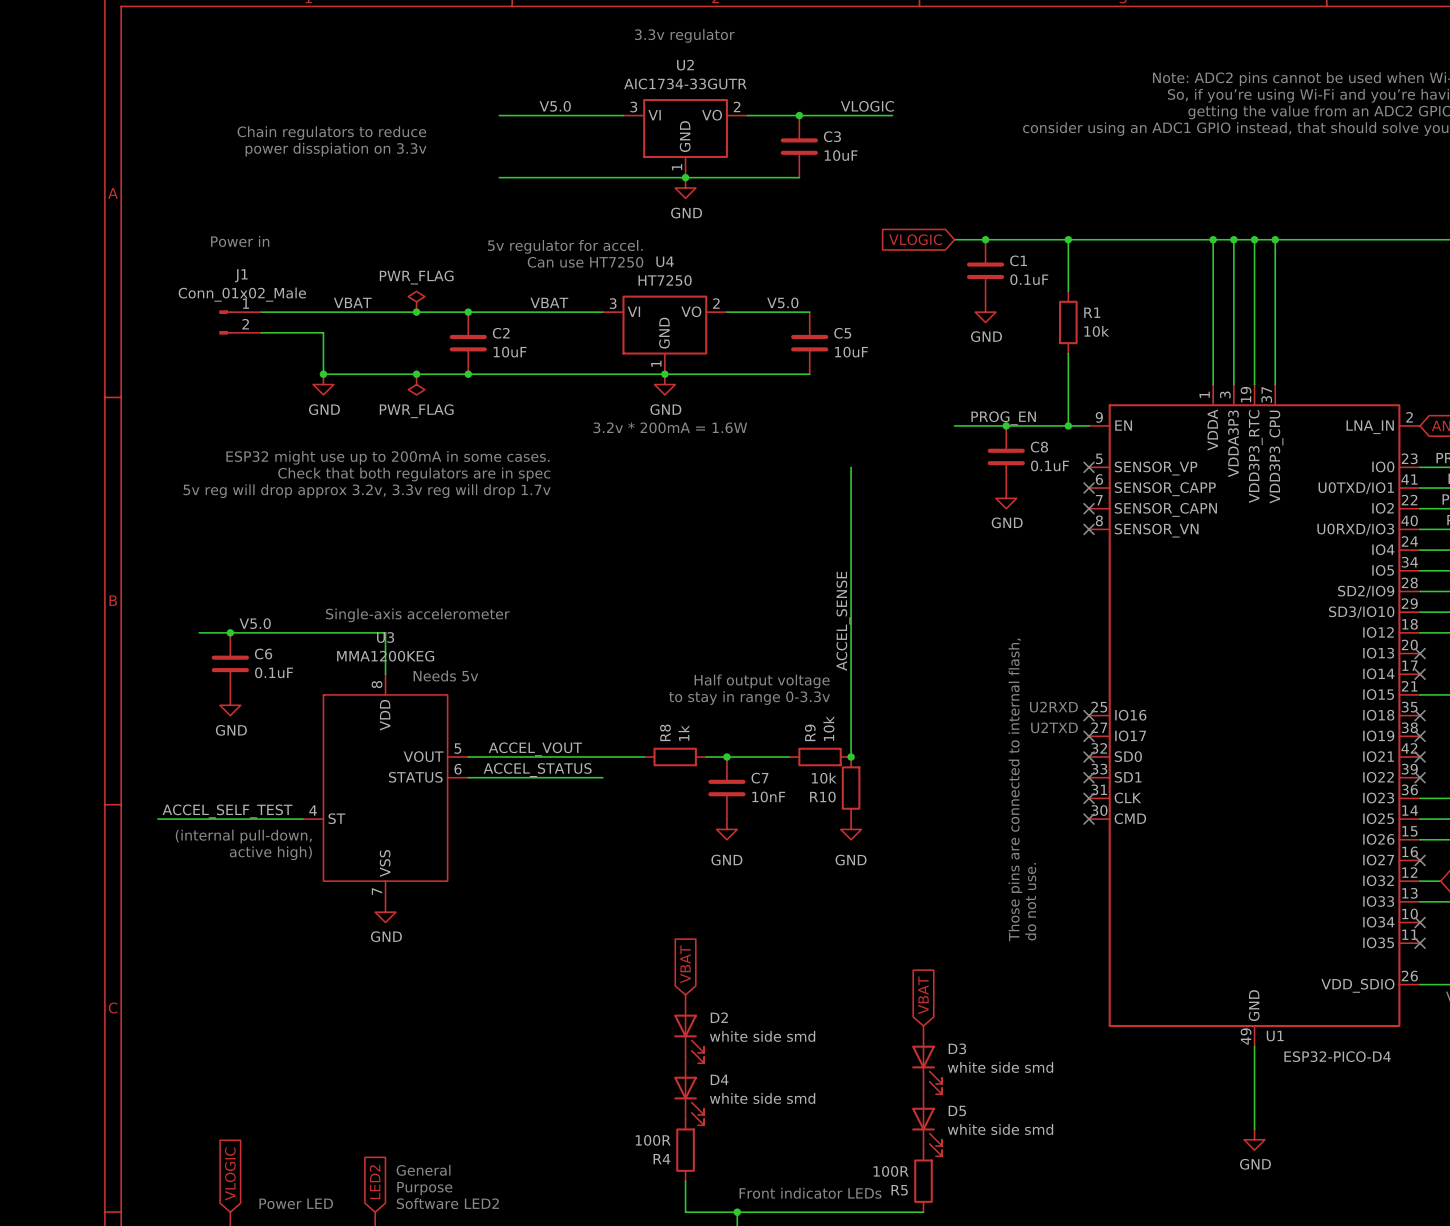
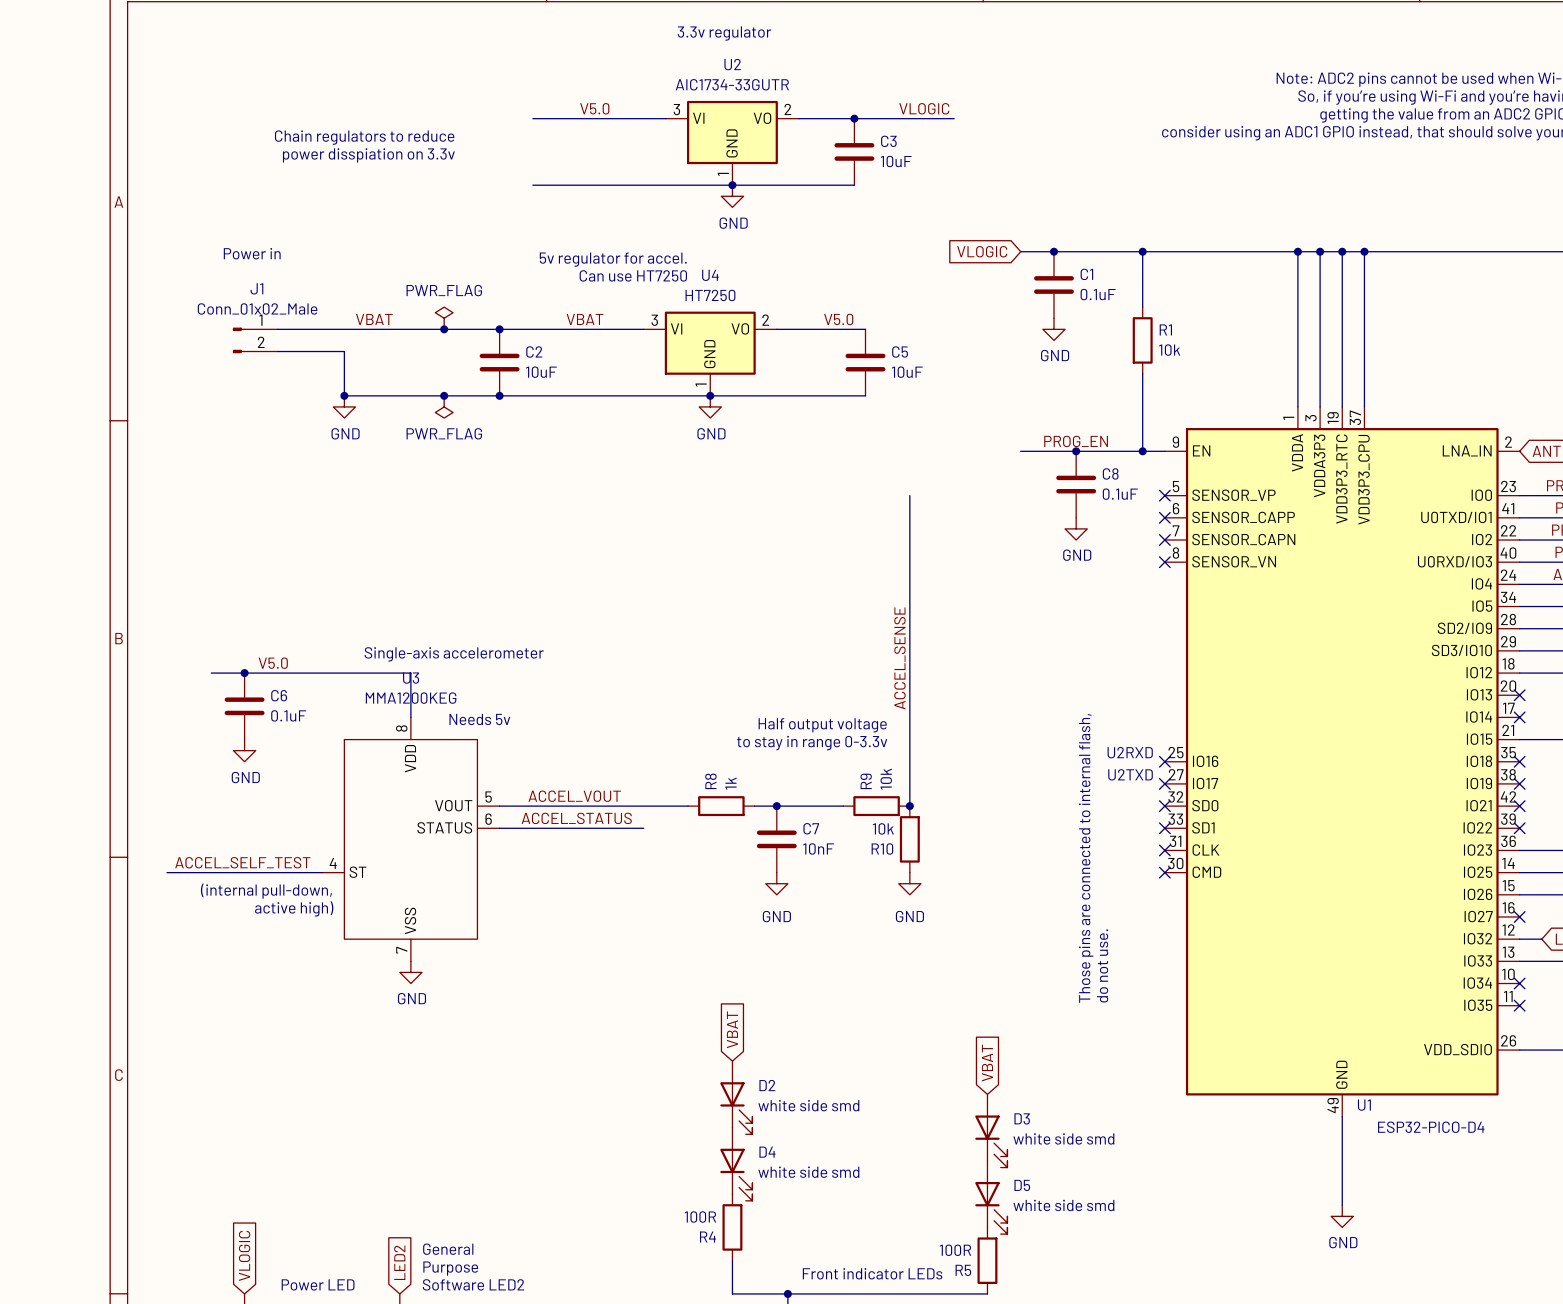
text: 3.2v * 200mA = 1.6W (670, 427) -> none
text: ESP32 might use up to 200mA in some cases. (387, 457) -> none
text: Check that both regulators are in spec (414, 474) -> none
text: 5v reg will drop approx 3.2v, 3.3v reg will drop 1.7v (367, 491) -> none

